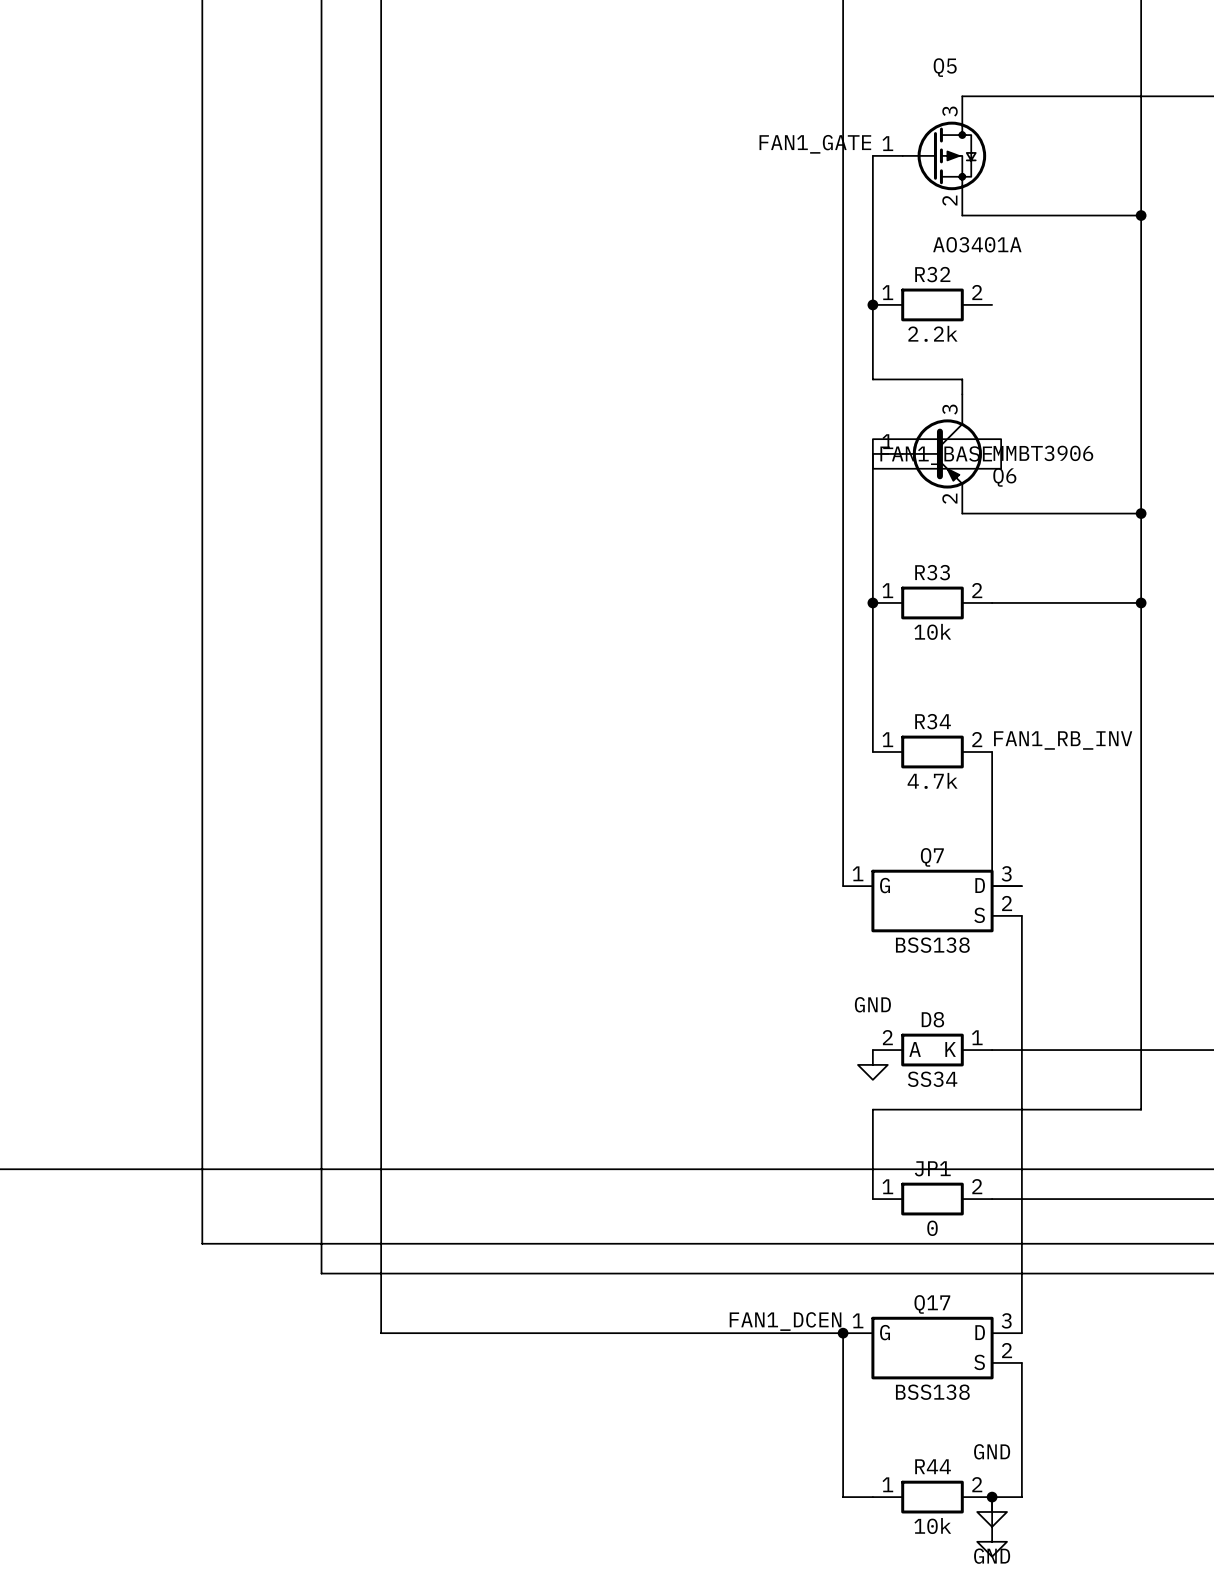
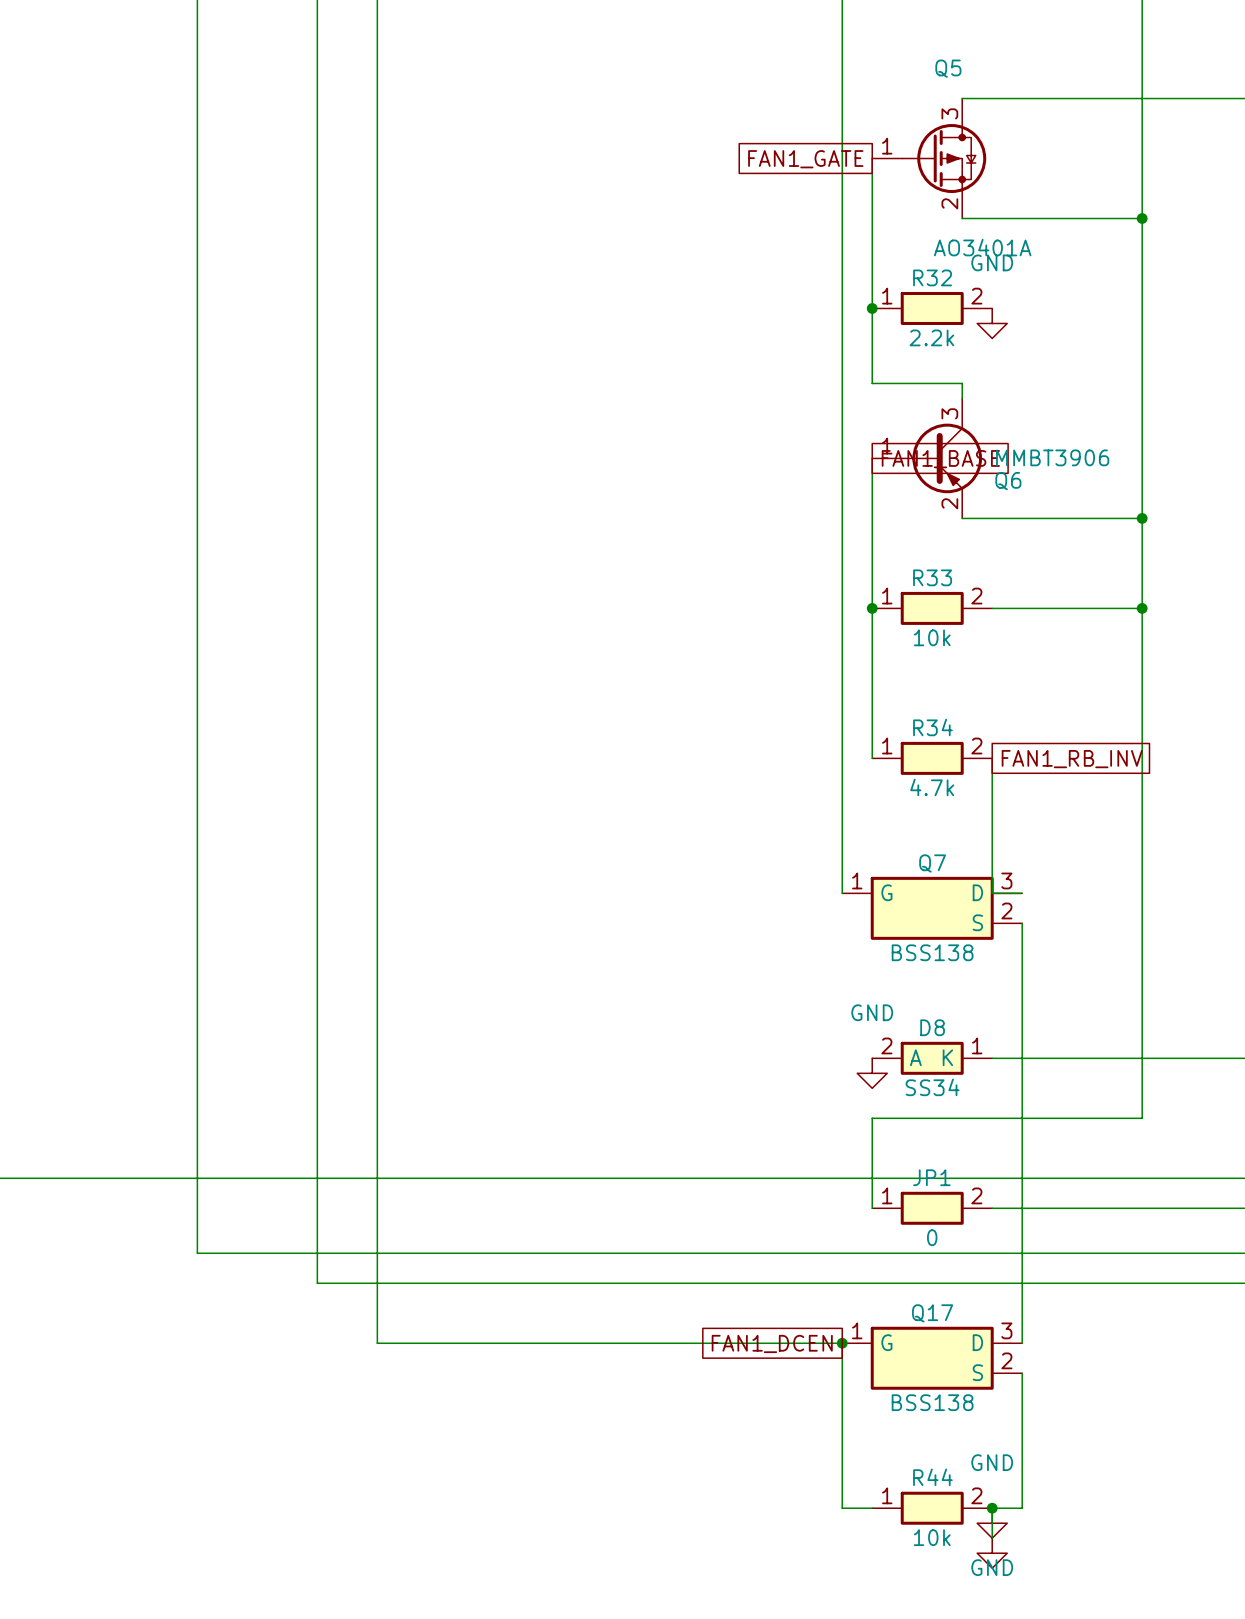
label: FAN1_GATE (815, 144) -> none
global label: none -> FAN1_GATE (805, 159)
power symbol: none -> GND (992, 323)
label: FAN1_RB_INV (1063, 740) -> none
global label: none -> FAN1_RB_INV (1072, 759)
label: FAN1_DCEN (785, 1321) -> none
global label: none -> FAN1_DCEN (772, 1343)

